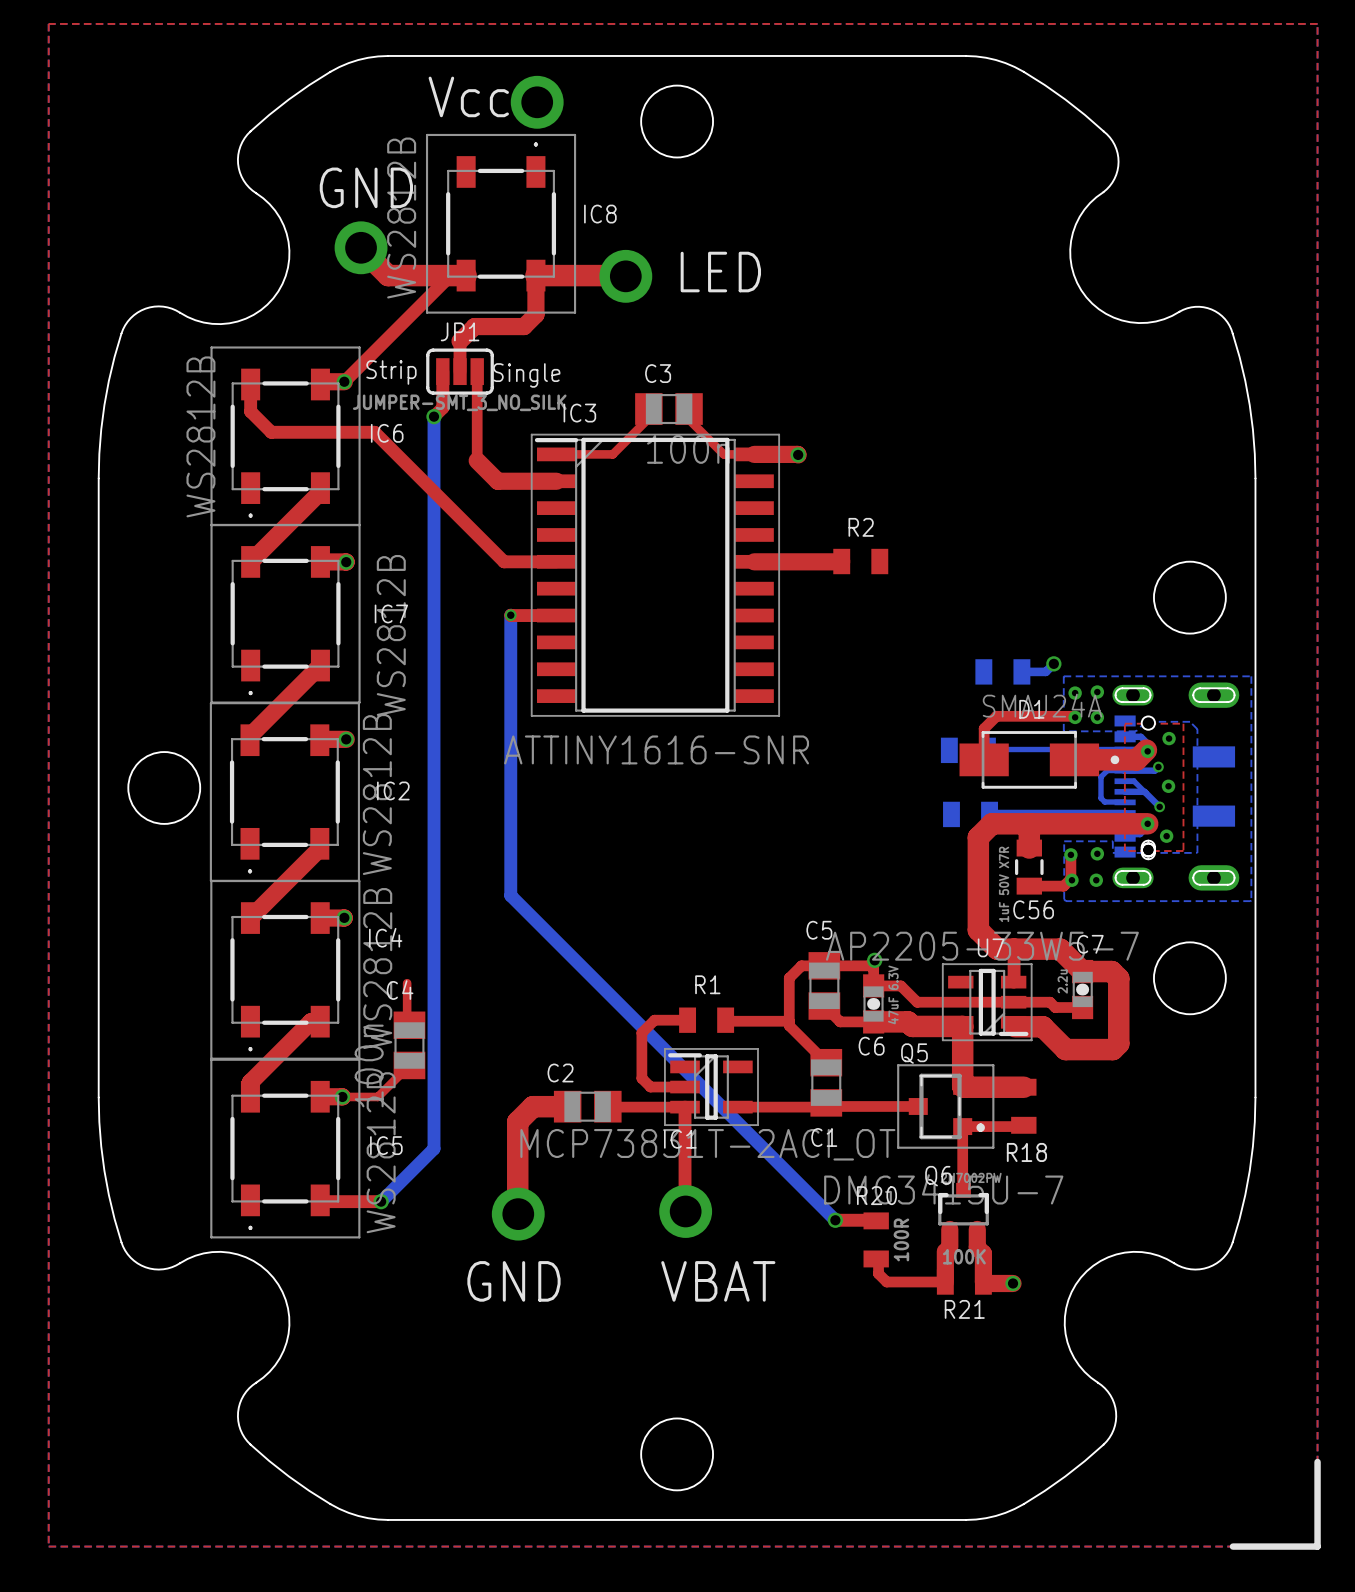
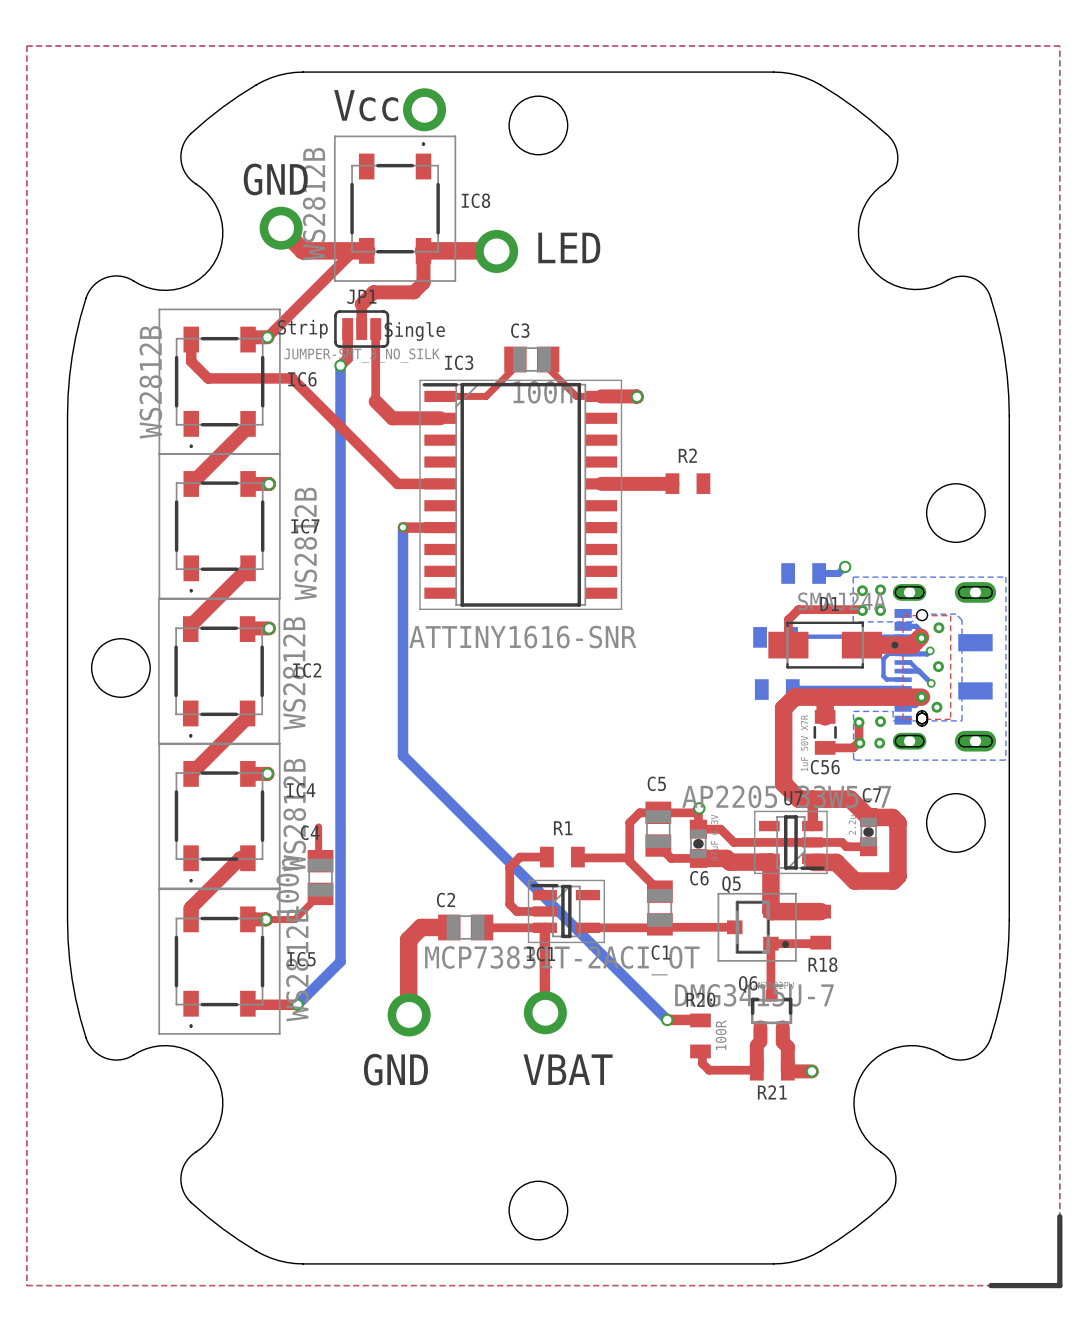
R21 value: 100K (964, 1256) -> none

